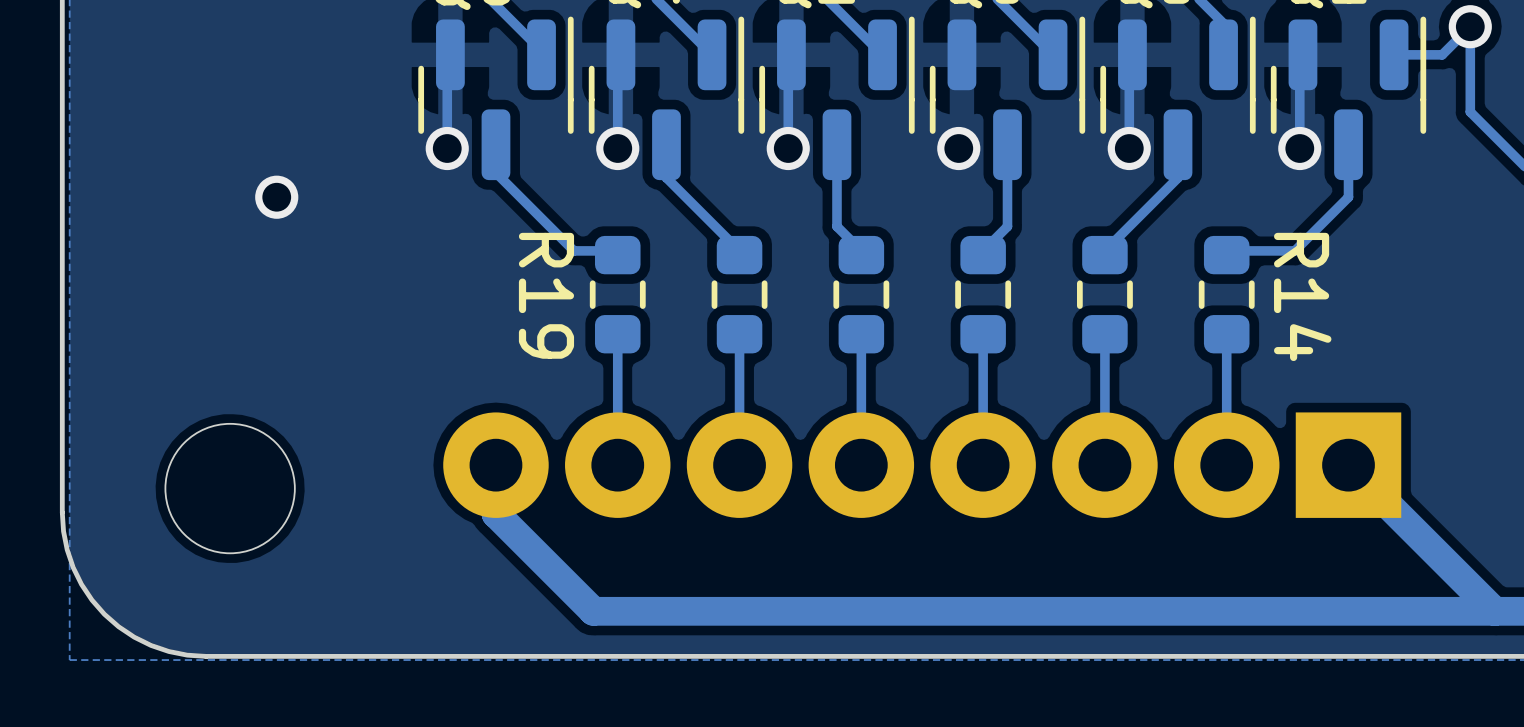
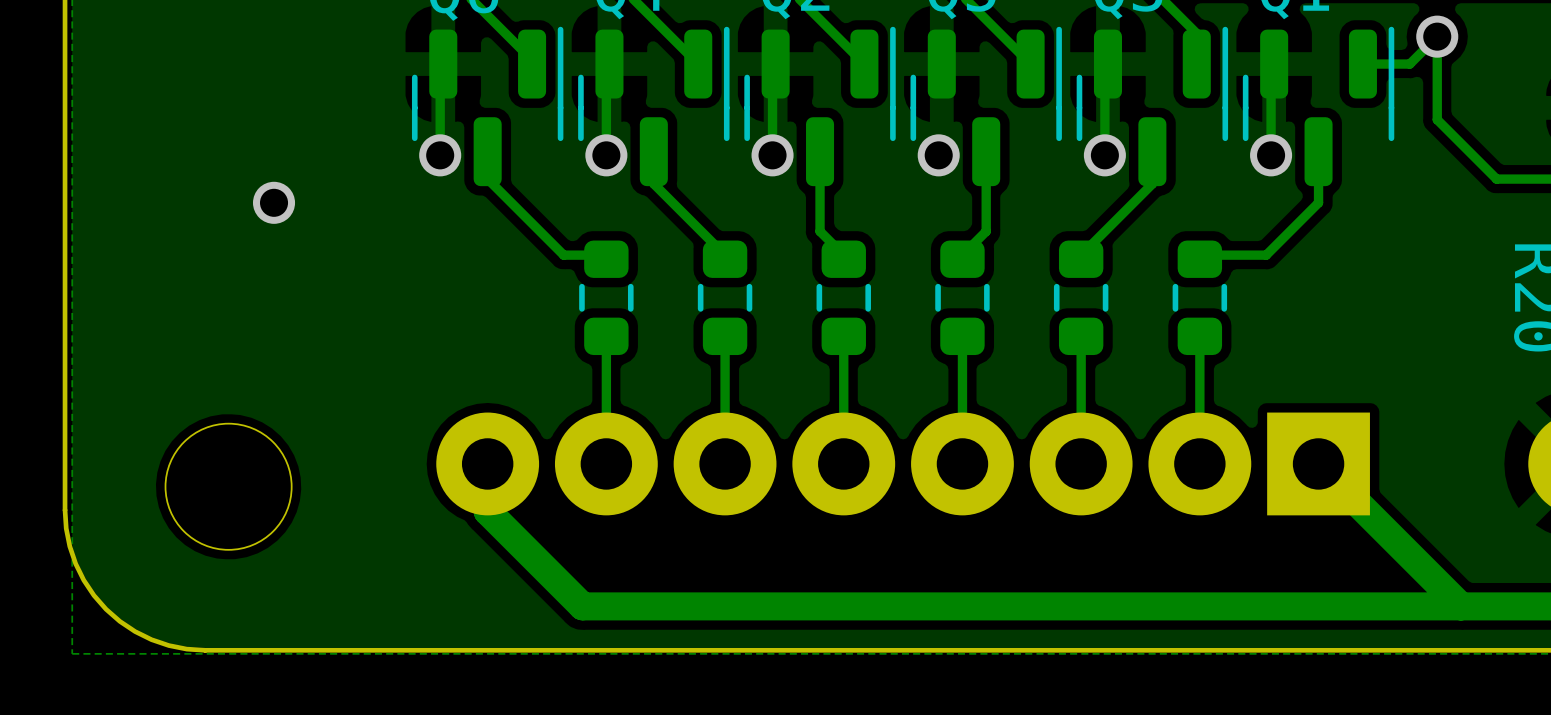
R19 name: R19 (546, 295) -> none
R14 name: R14 (1302, 296) -> none

